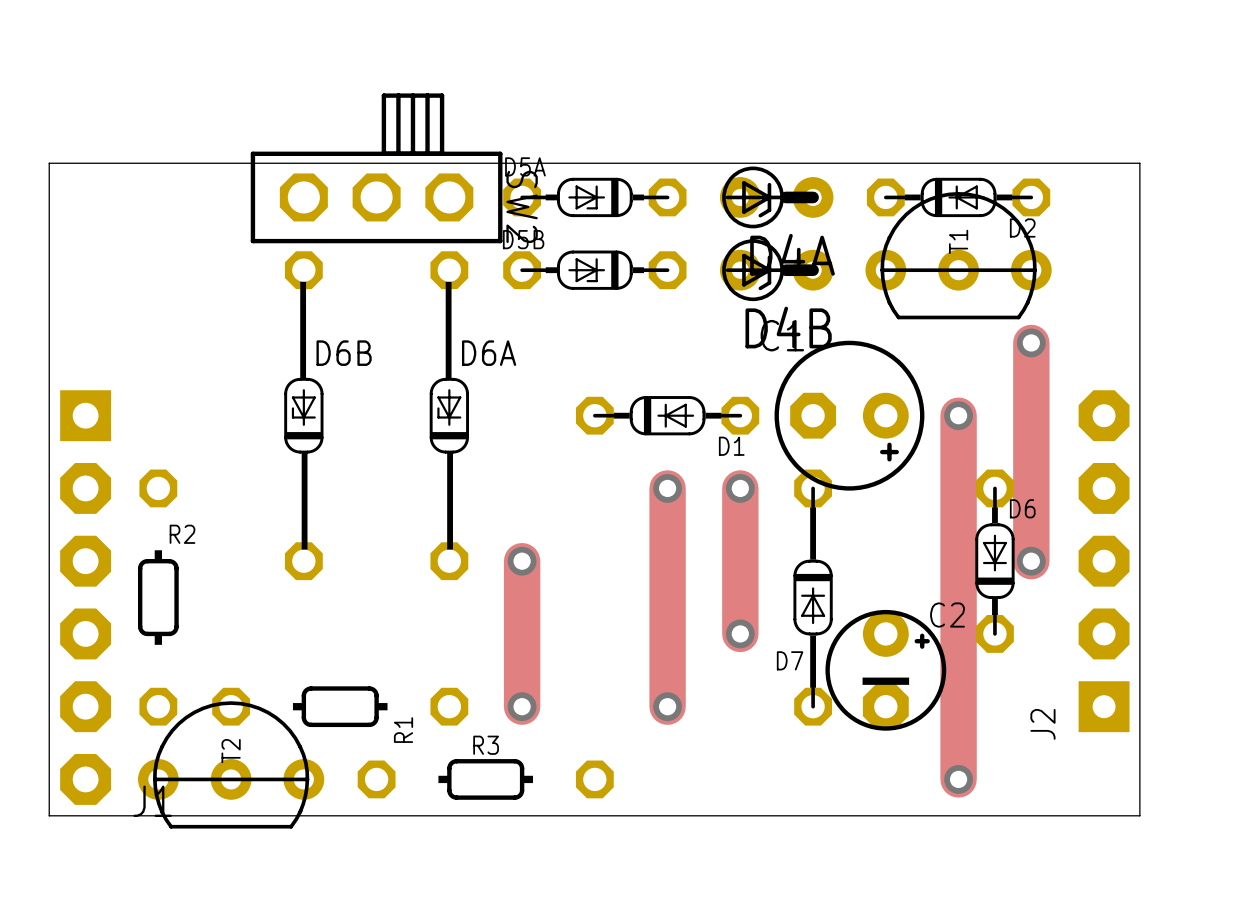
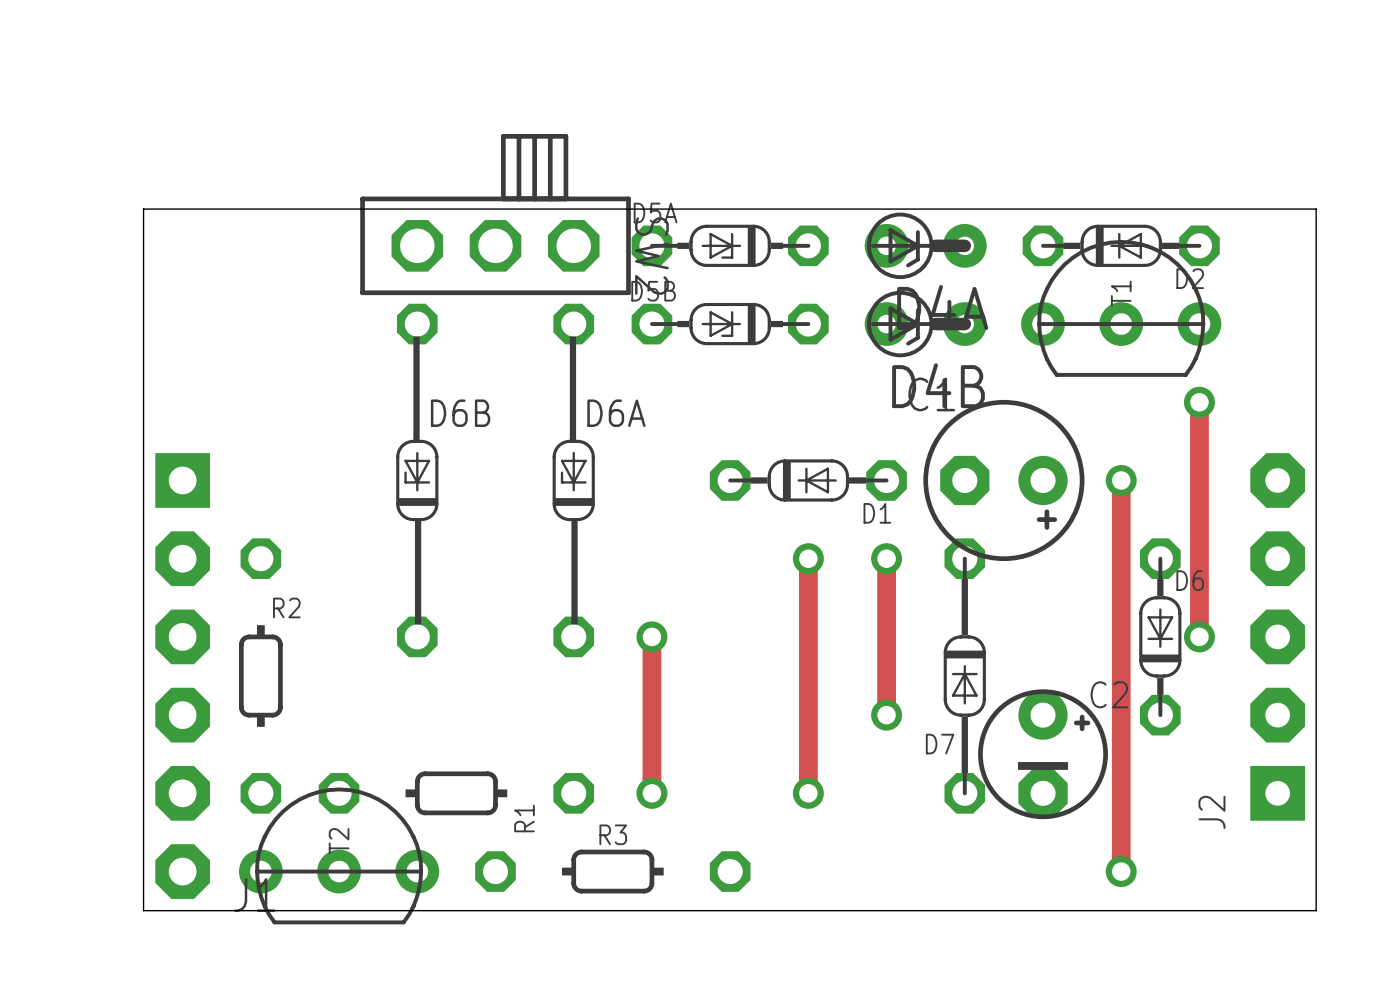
track width: thick (1031, 342) (1031, 561) -> thin (1199, 402) (1199, 636)
track width: thick (958, 415) (958, 779) -> thin (1121, 480) (1121, 871)
track width: thick (667, 488) (667, 706) -> thin (808, 558) (808, 793)
track width: thick (740, 488) (740, 633) -> thin (886, 558) (886, 715)
track width: thick (522, 561) (522, 706) -> thin (651, 636) (651, 793)

